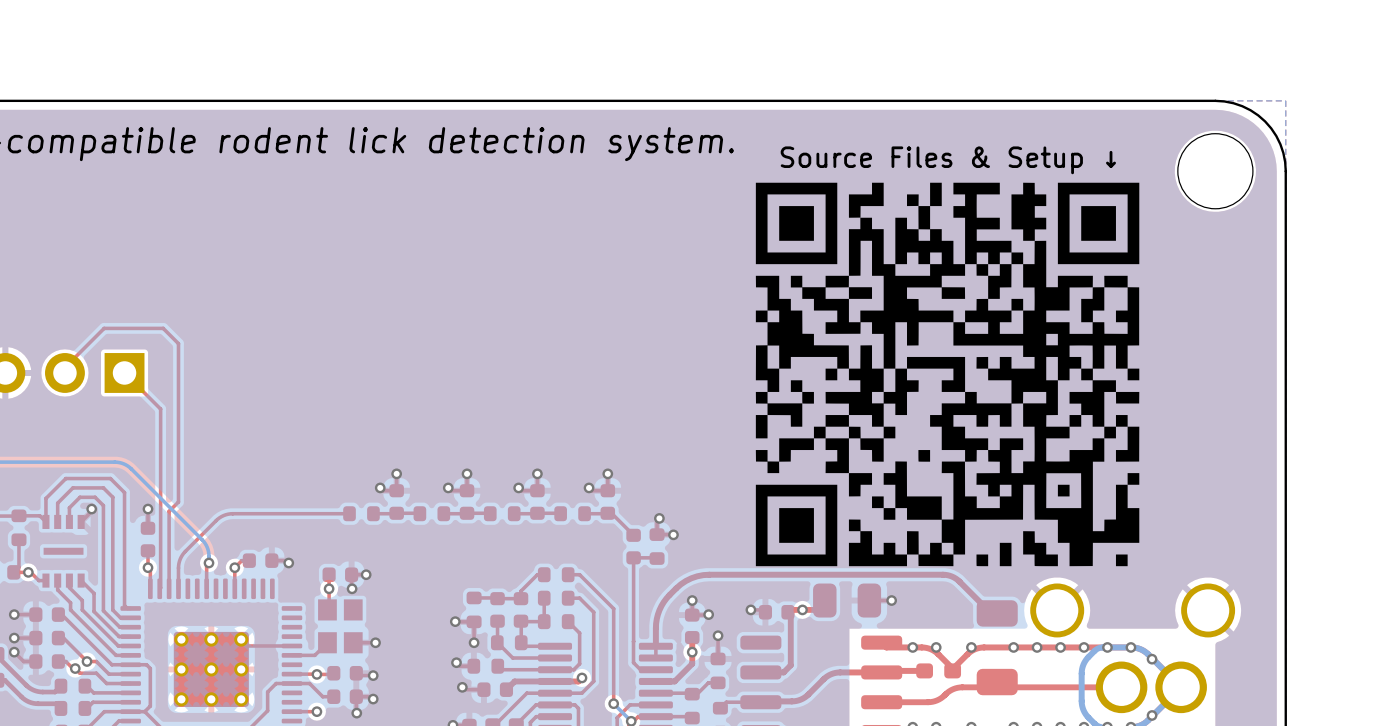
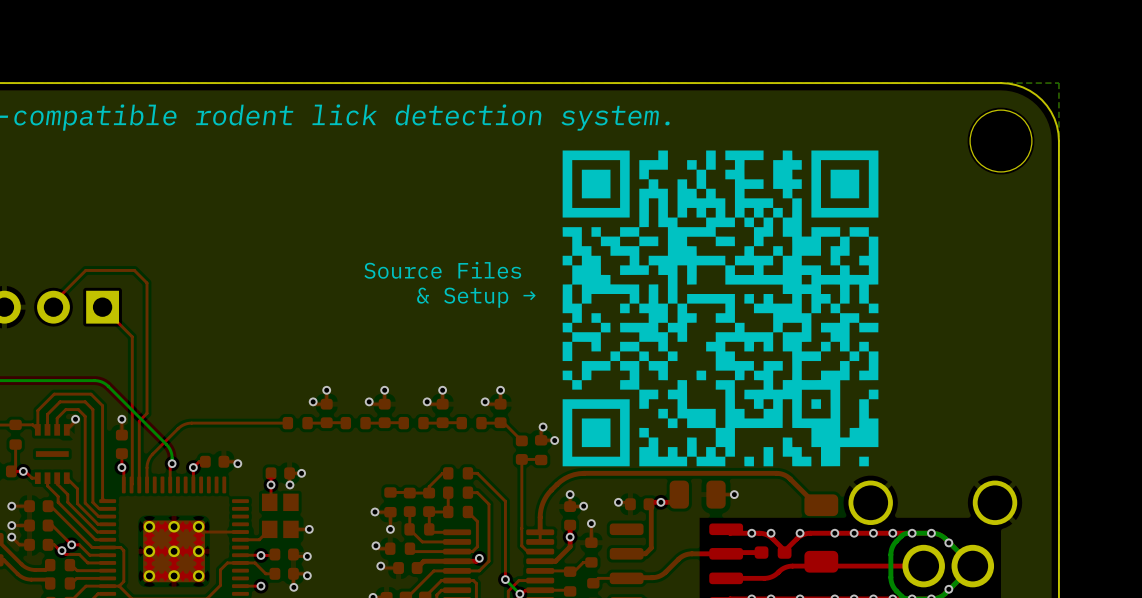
text: Source Files & Setup ↓ (948, 160) -> none
text: none -> Source Files (442, 270)
text: none -> & Setup → (476, 297)
drawing position: (947, 374) -> (720, 308)

